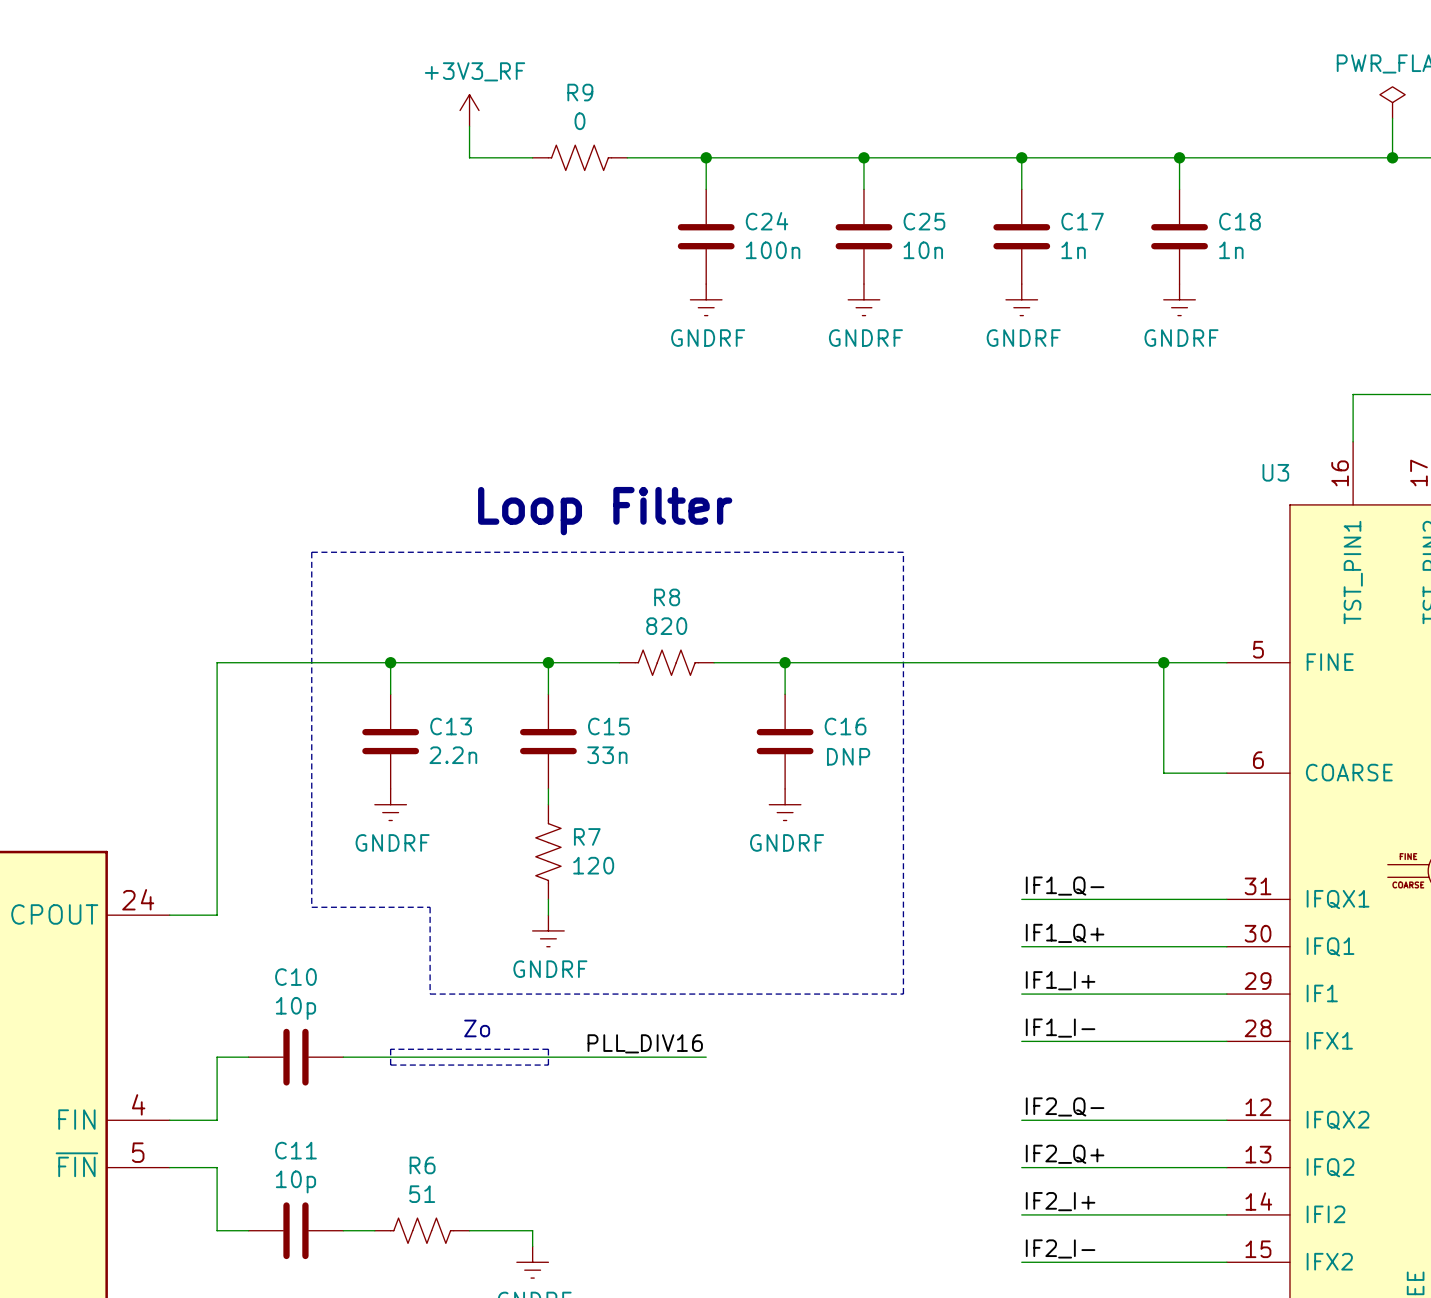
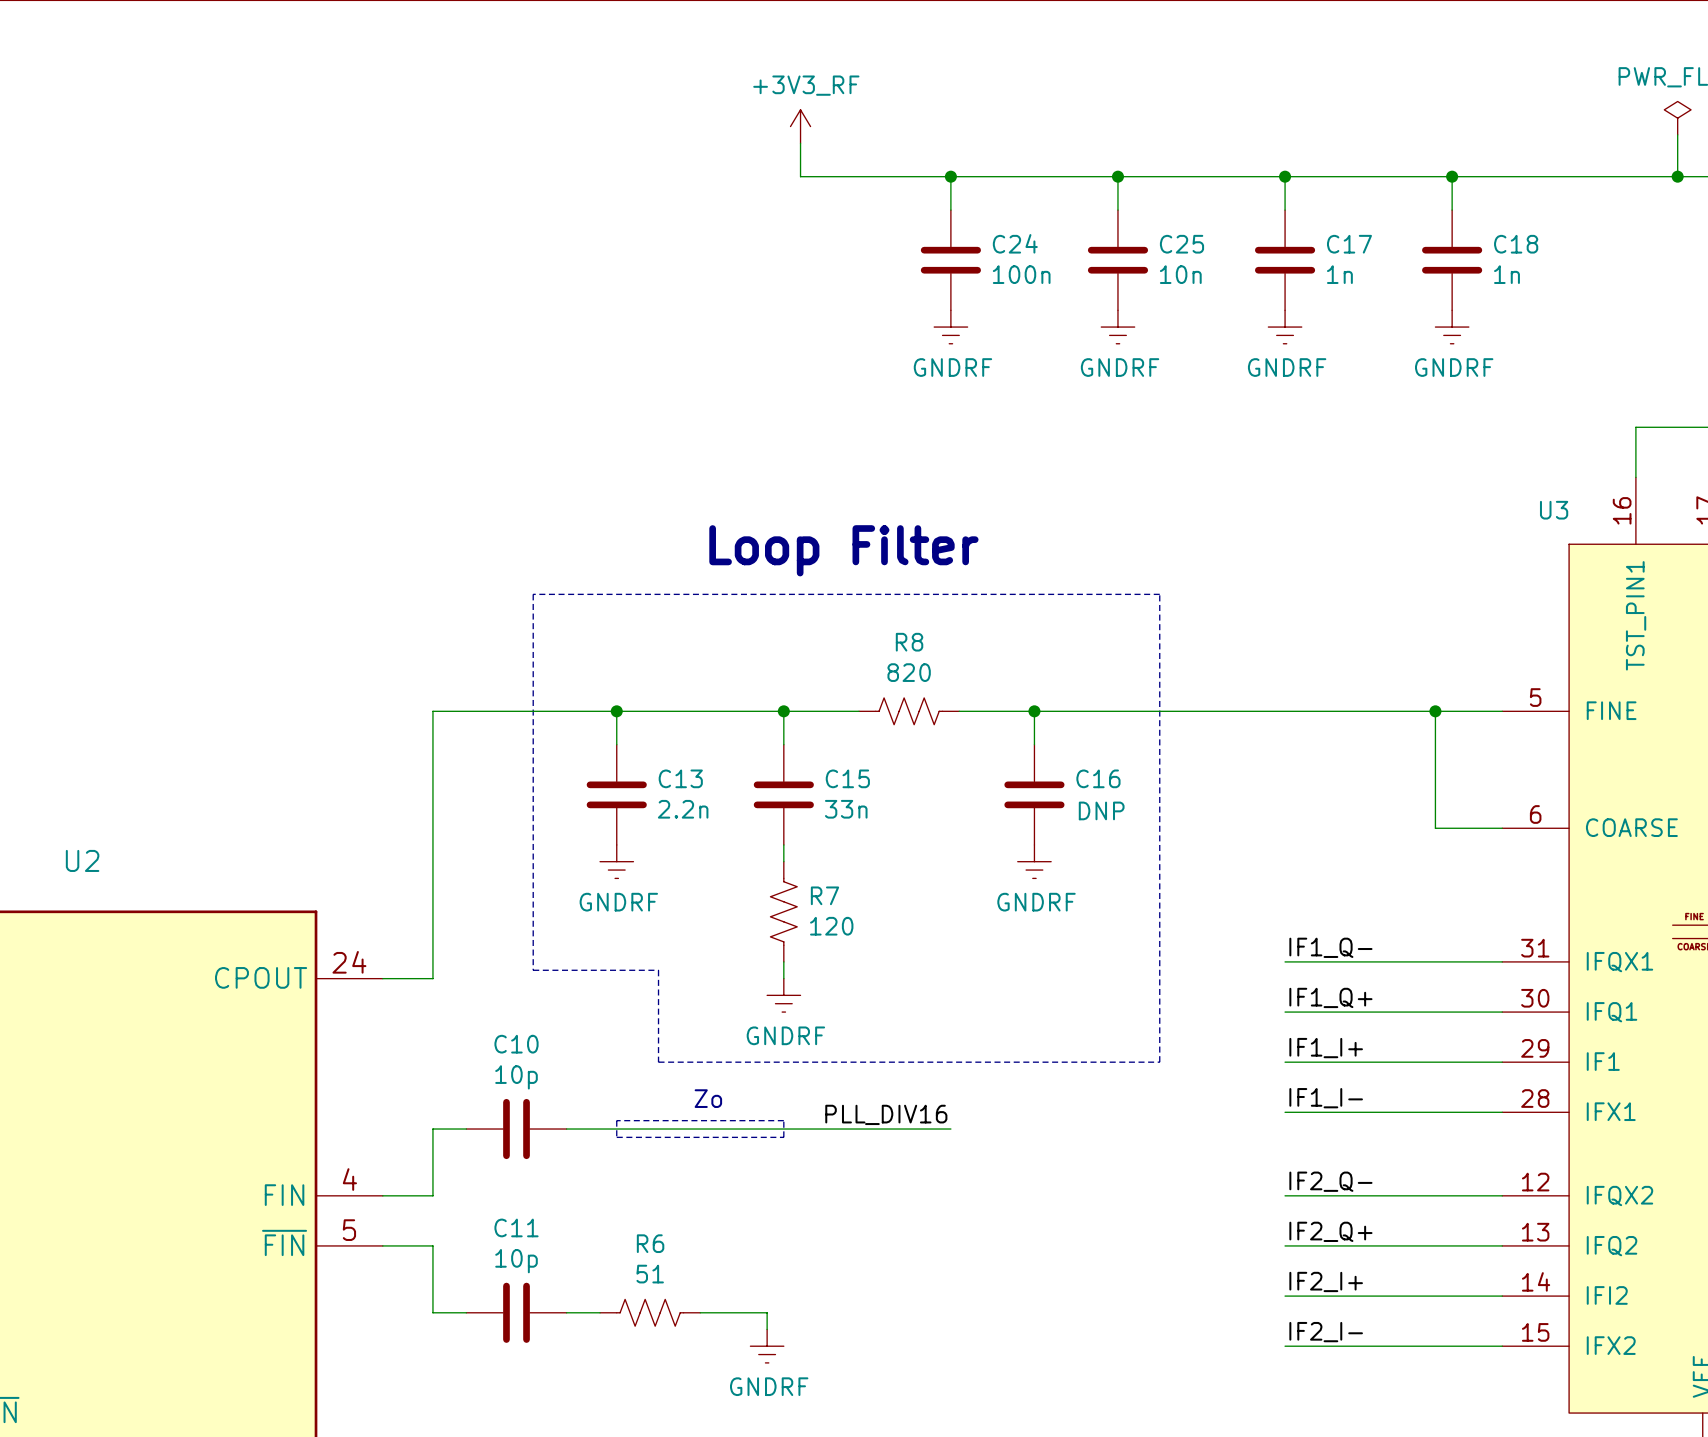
power symbol position: +3V3_RF (469, 110) -> +3V3_RF (800, 126)
wire: (469, 126) (469, 157) (532, 157) -> (800, 143) (800, 176) (867, 176)
R9: 0 (579, 157) -> none

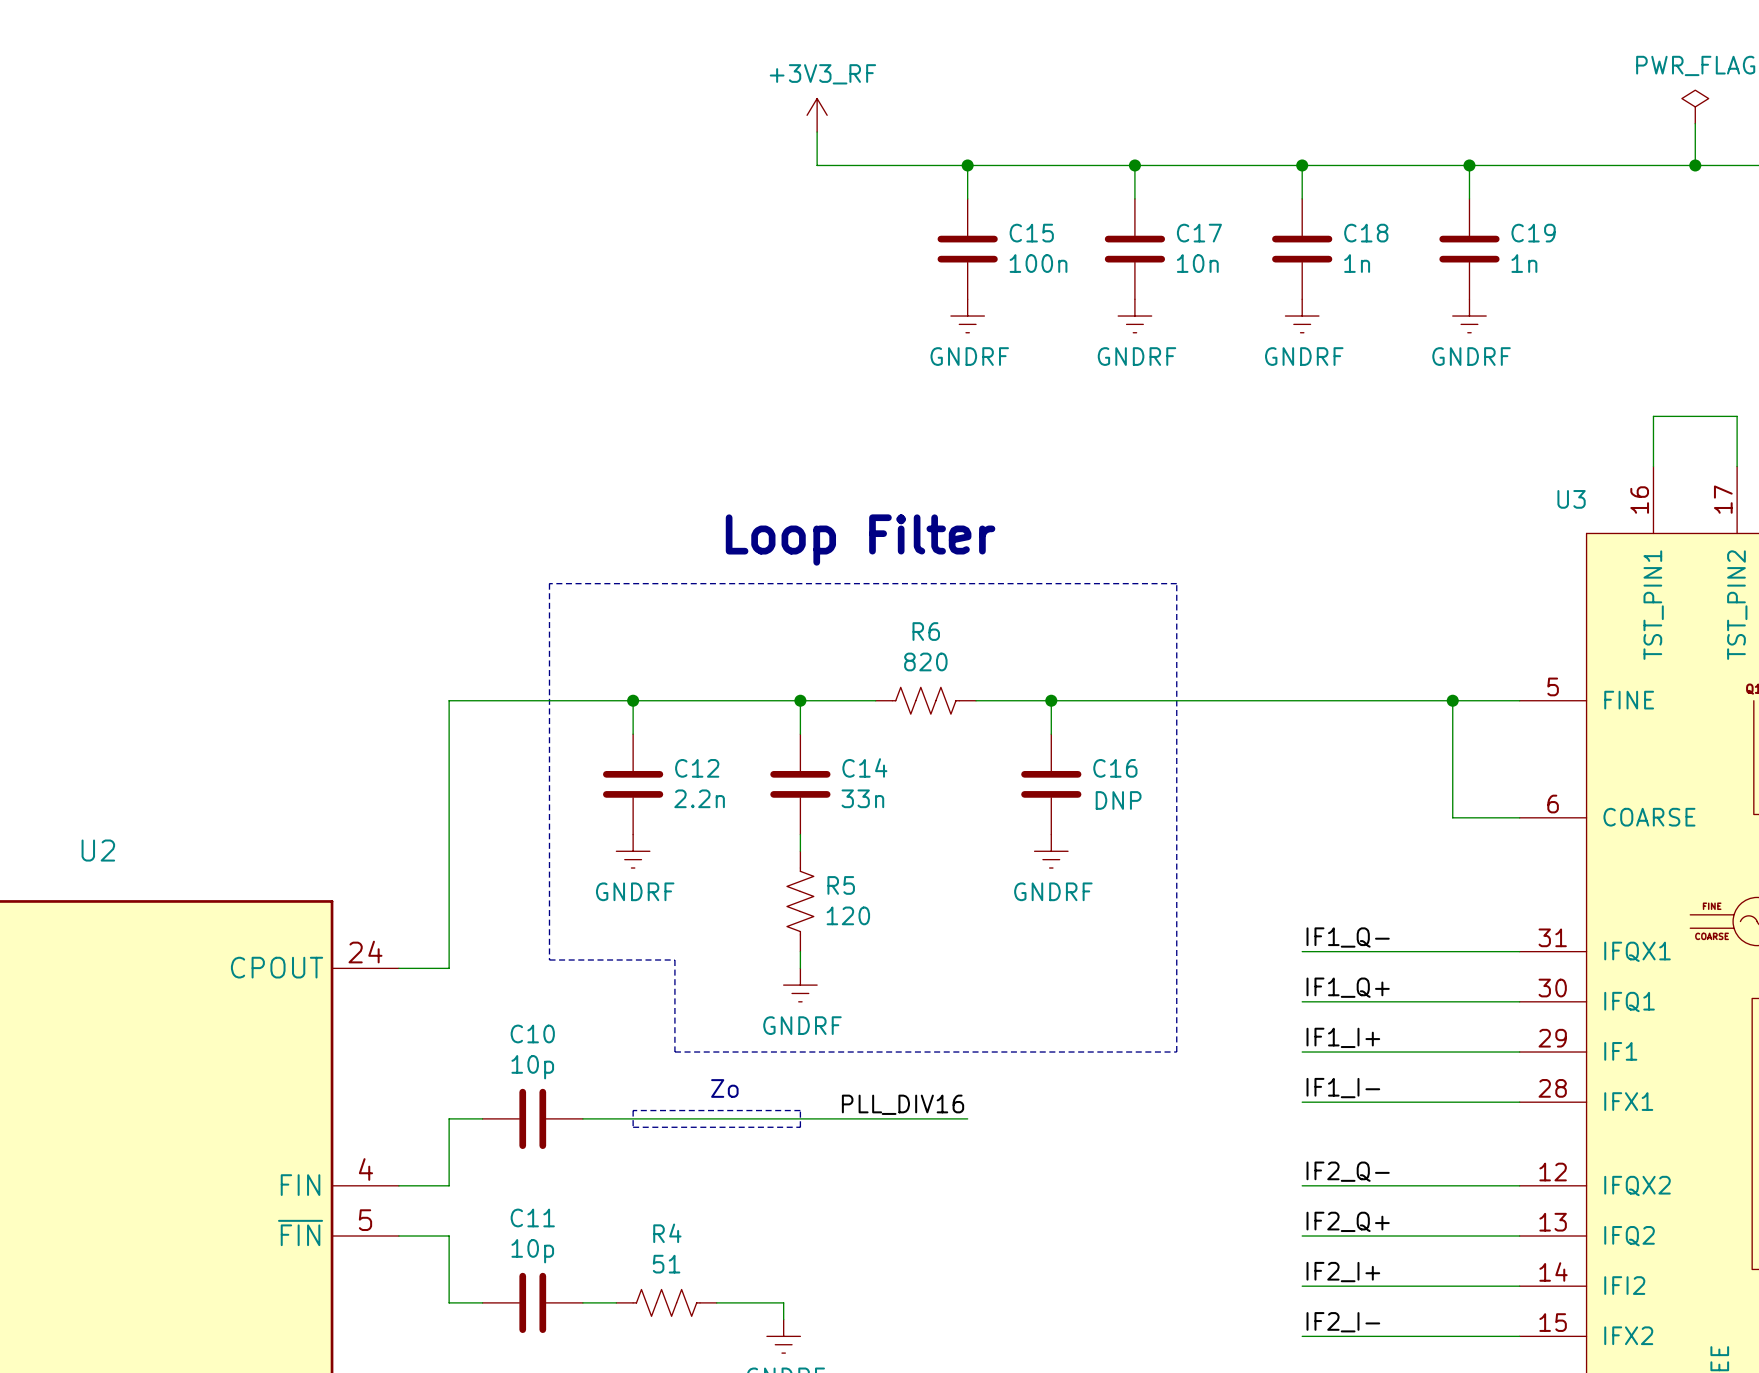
C24 name: C24 (1015, 243) -> C15 (1031, 233)
C25 name: C25 (1181, 244) -> C17 (1199, 233)
C17 name: C17 (1349, 244) -> C18 (1366, 233)
C18 name: C18 (1516, 244) -> C19 (1533, 233)
R8 name: R8 (909, 642) -> R6 (926, 631)
C13 name: C13 (680, 778) -> C12 (697, 768)
C15 name: C15 (847, 778) -> C14 (864, 767)
R7 name: R7 (824, 895) -> R5 (841, 885)
R6 name: R6 (650, 1243) -> R4 (667, 1233)

